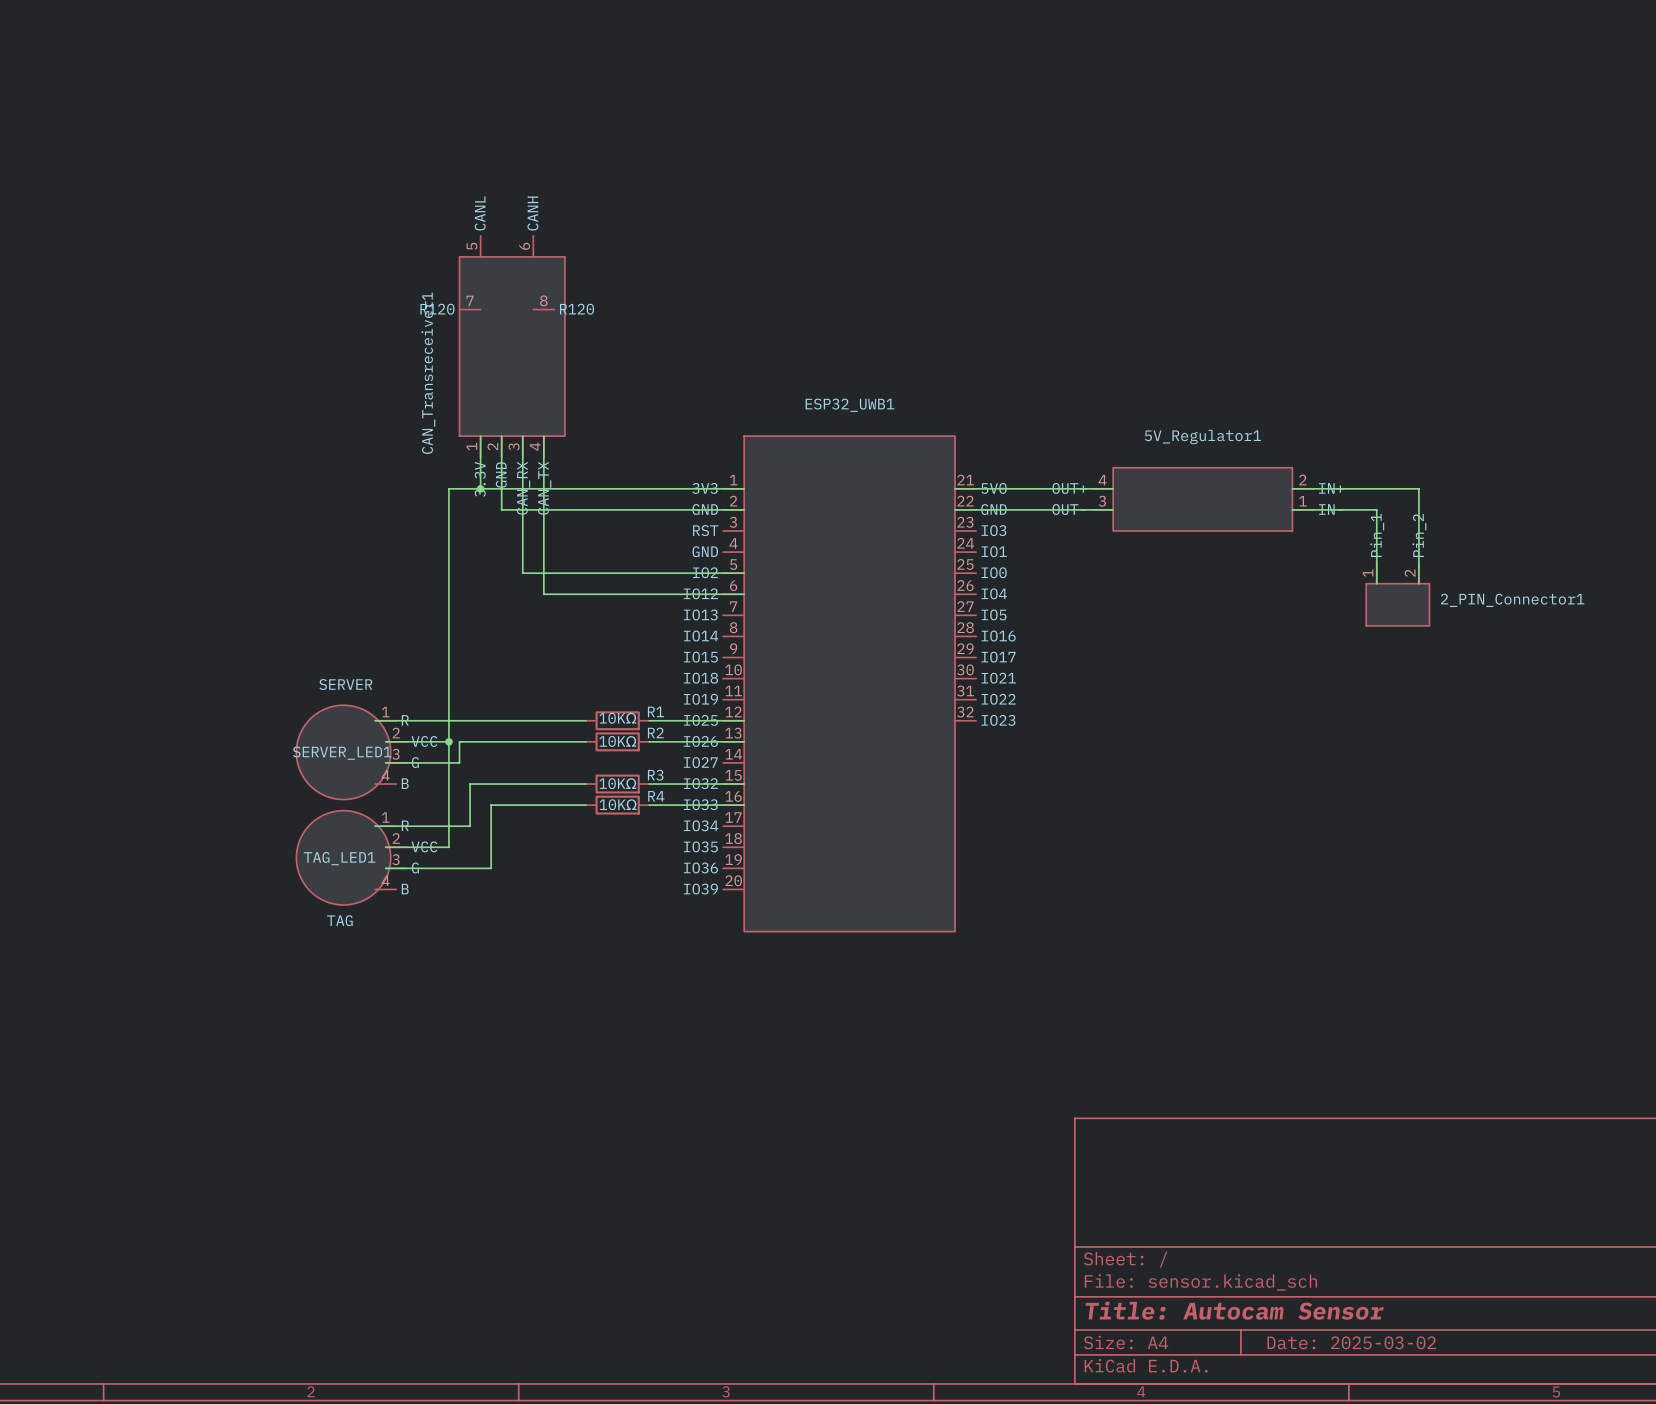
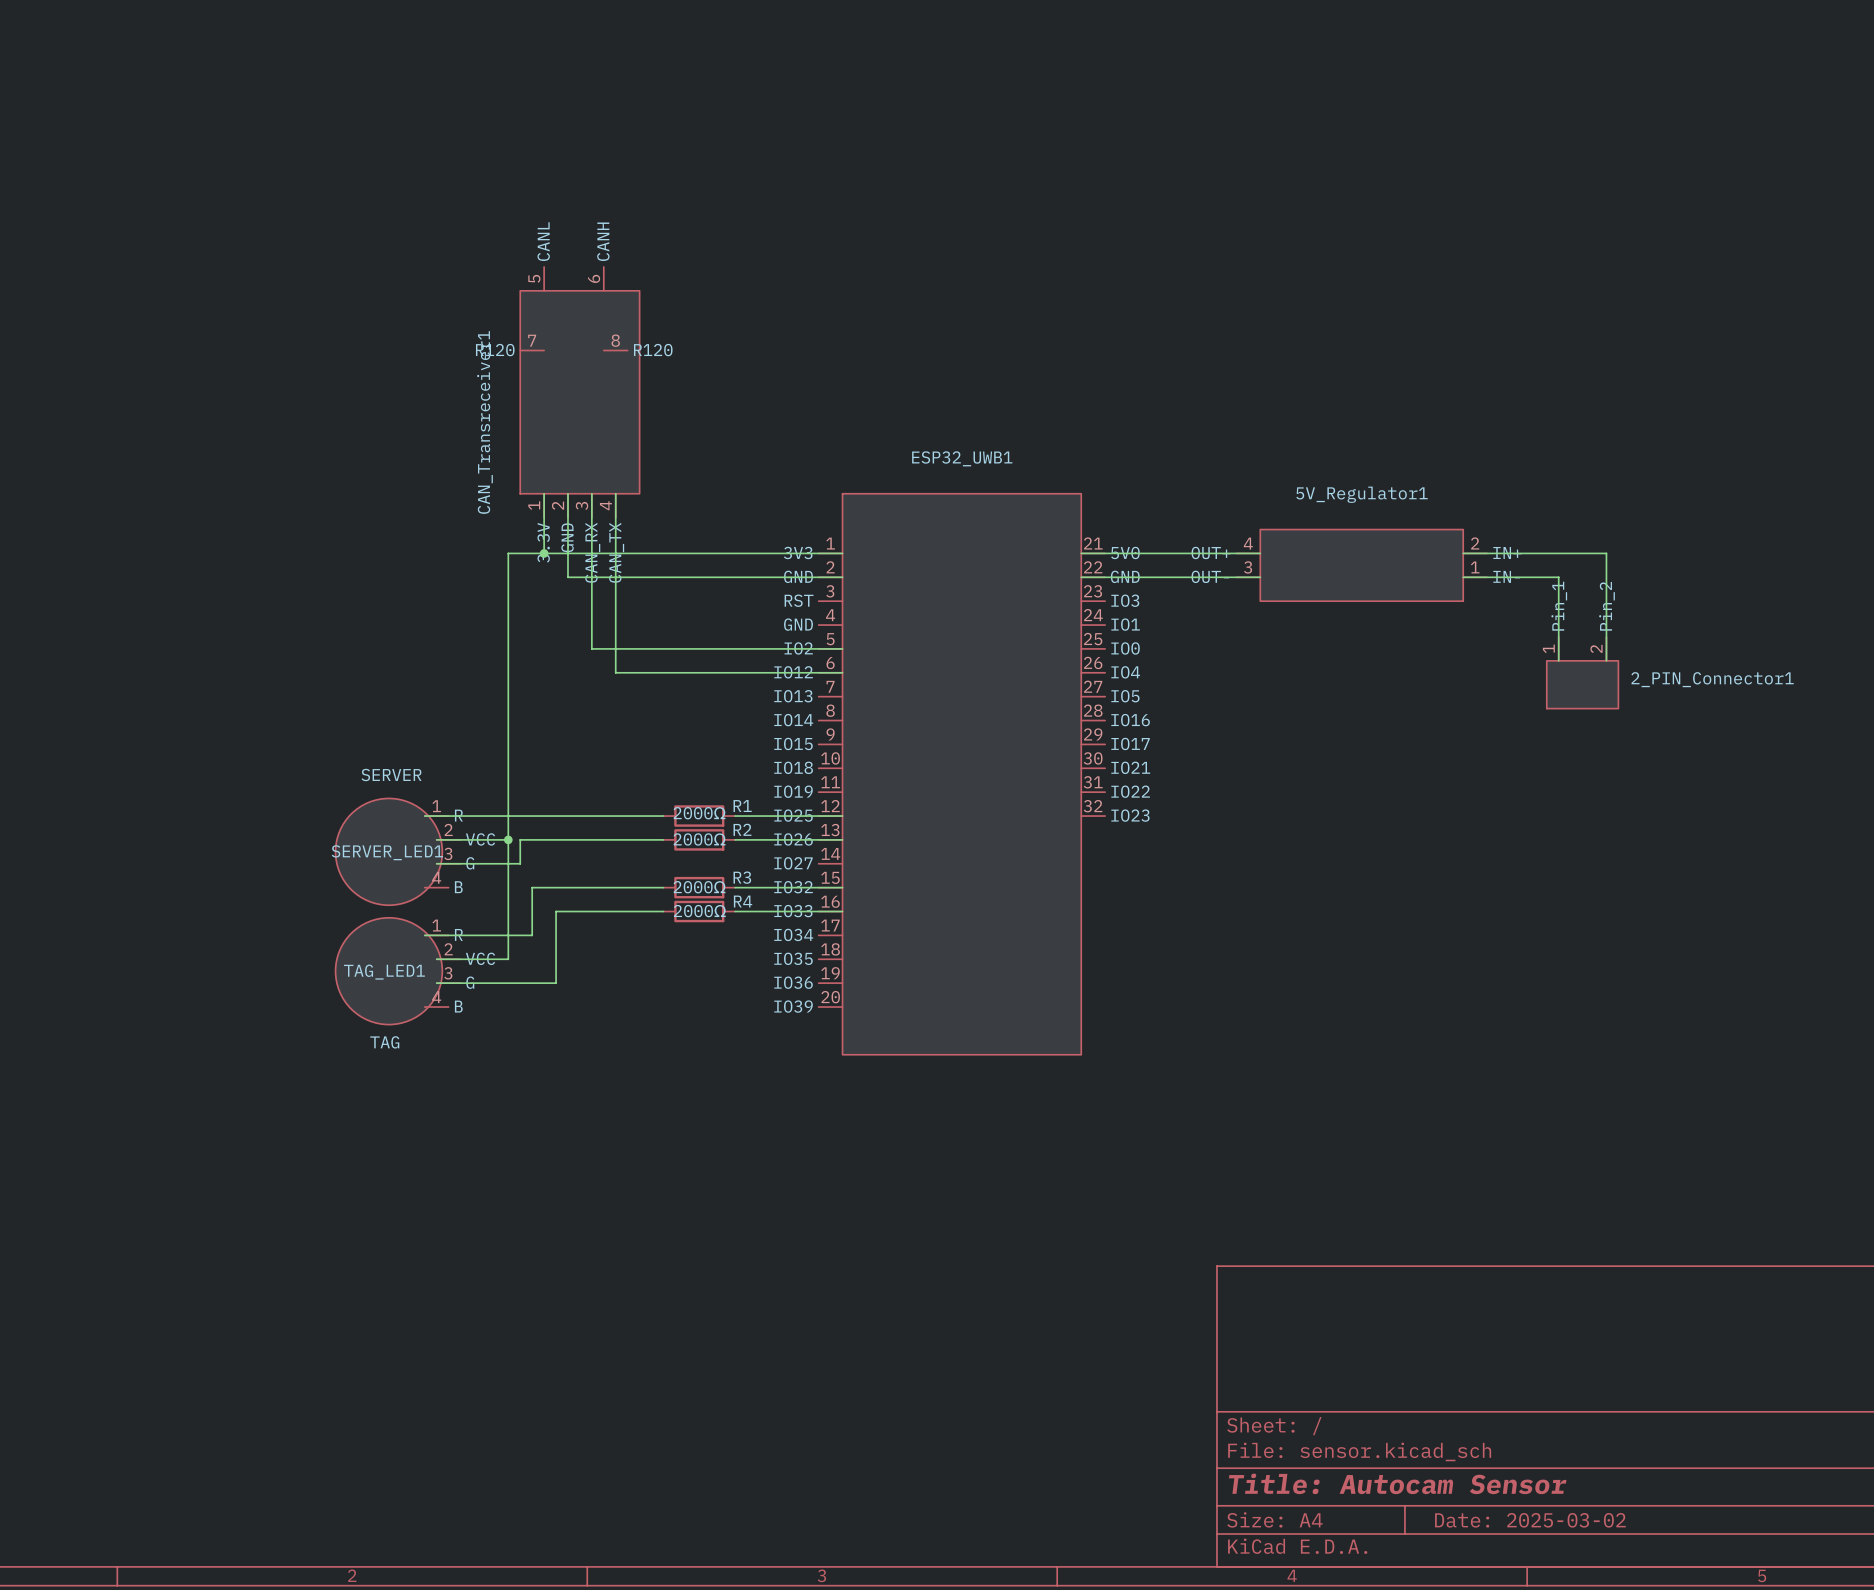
R1 value: 10KΩ (617, 718) -> 2000Ω (699, 813)
R2 value: 10KΩ (617, 741) -> 2000Ω (699, 839)
R3 value: 10KΩ (617, 783) -> 2000Ω (699, 887)
R4 value: 10KΩ (618, 804) -> 2000Ω (699, 911)

